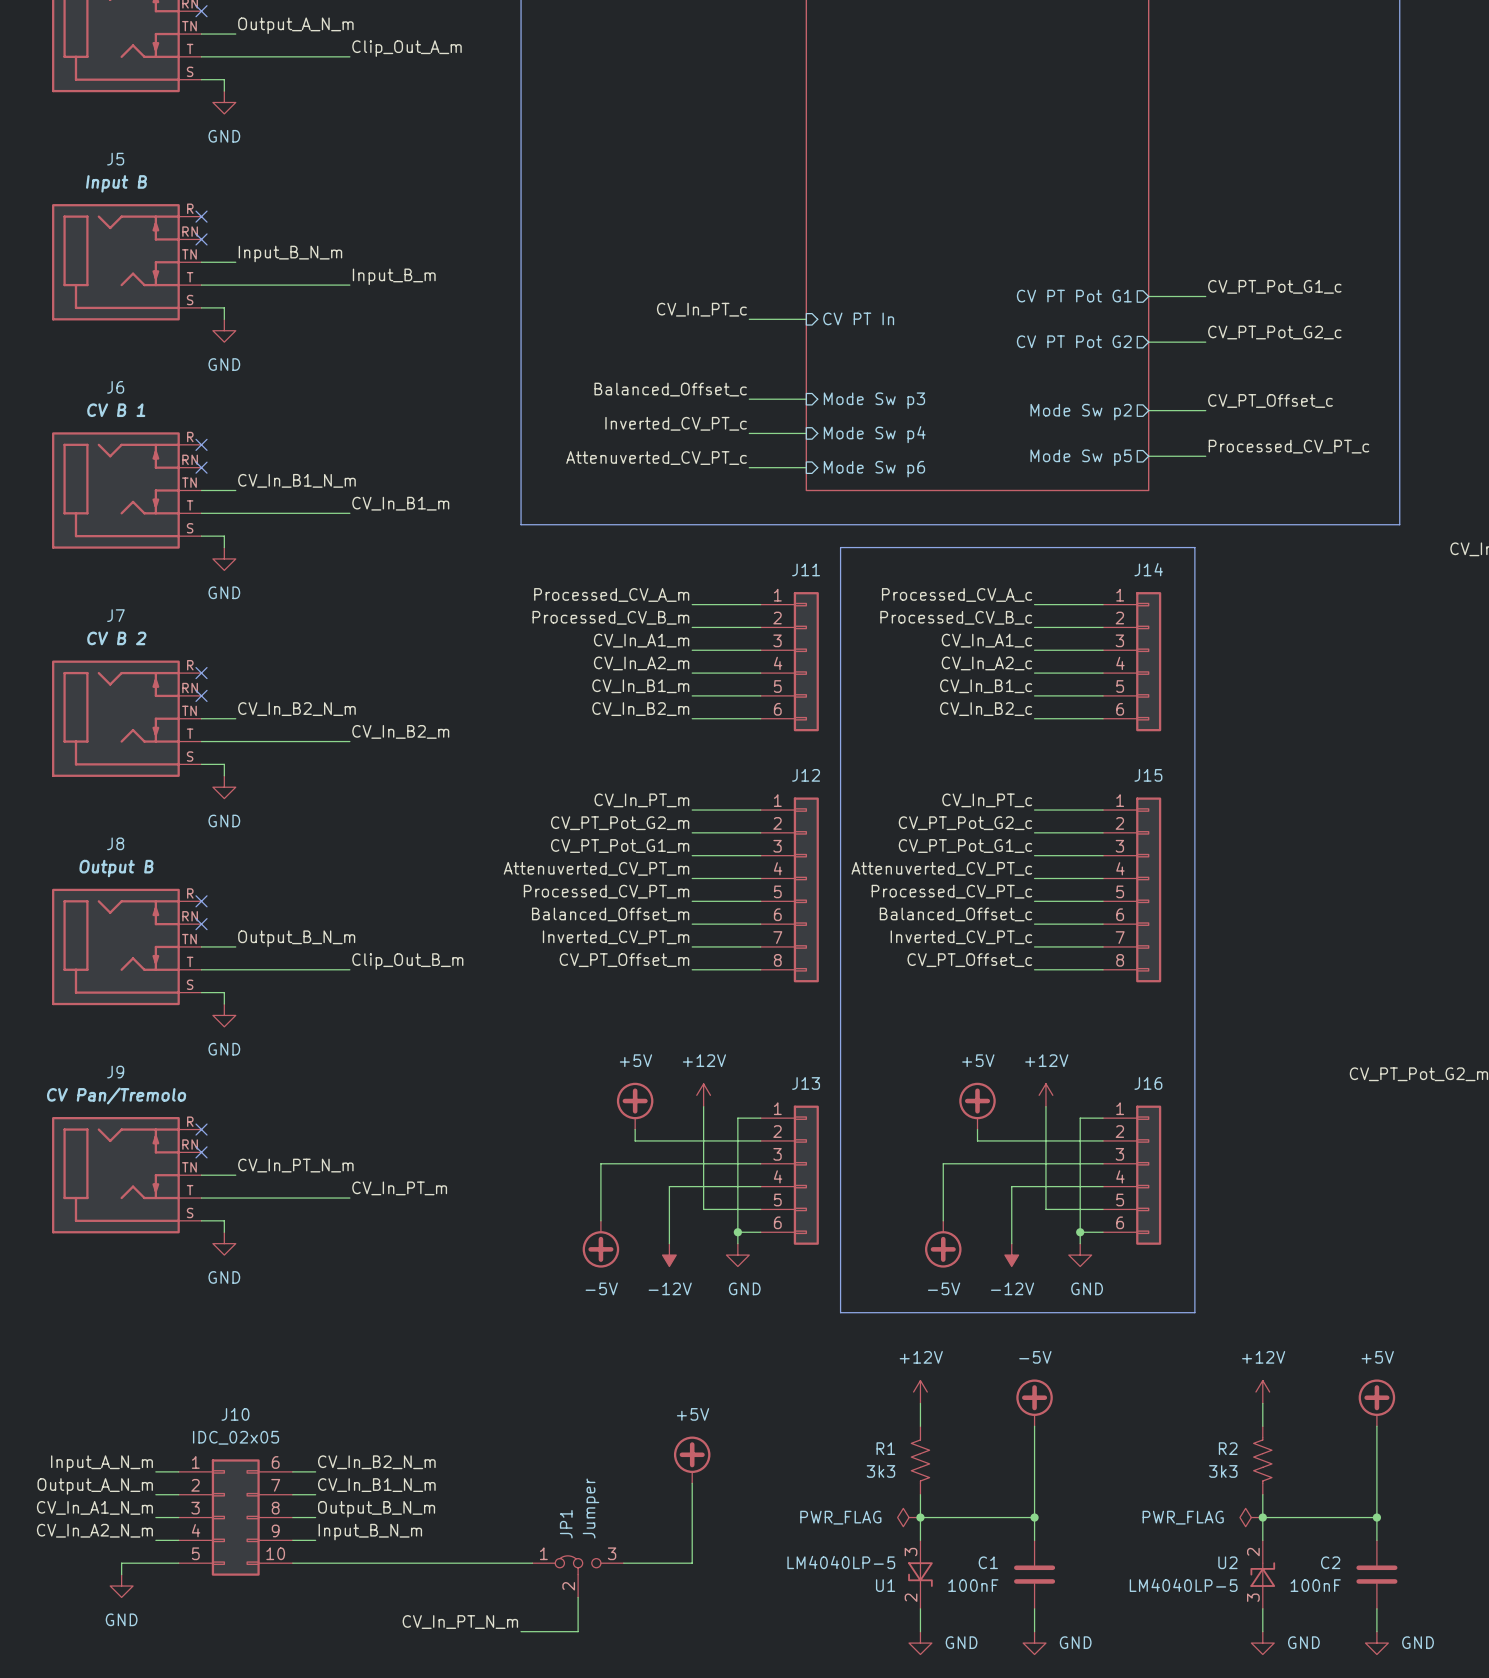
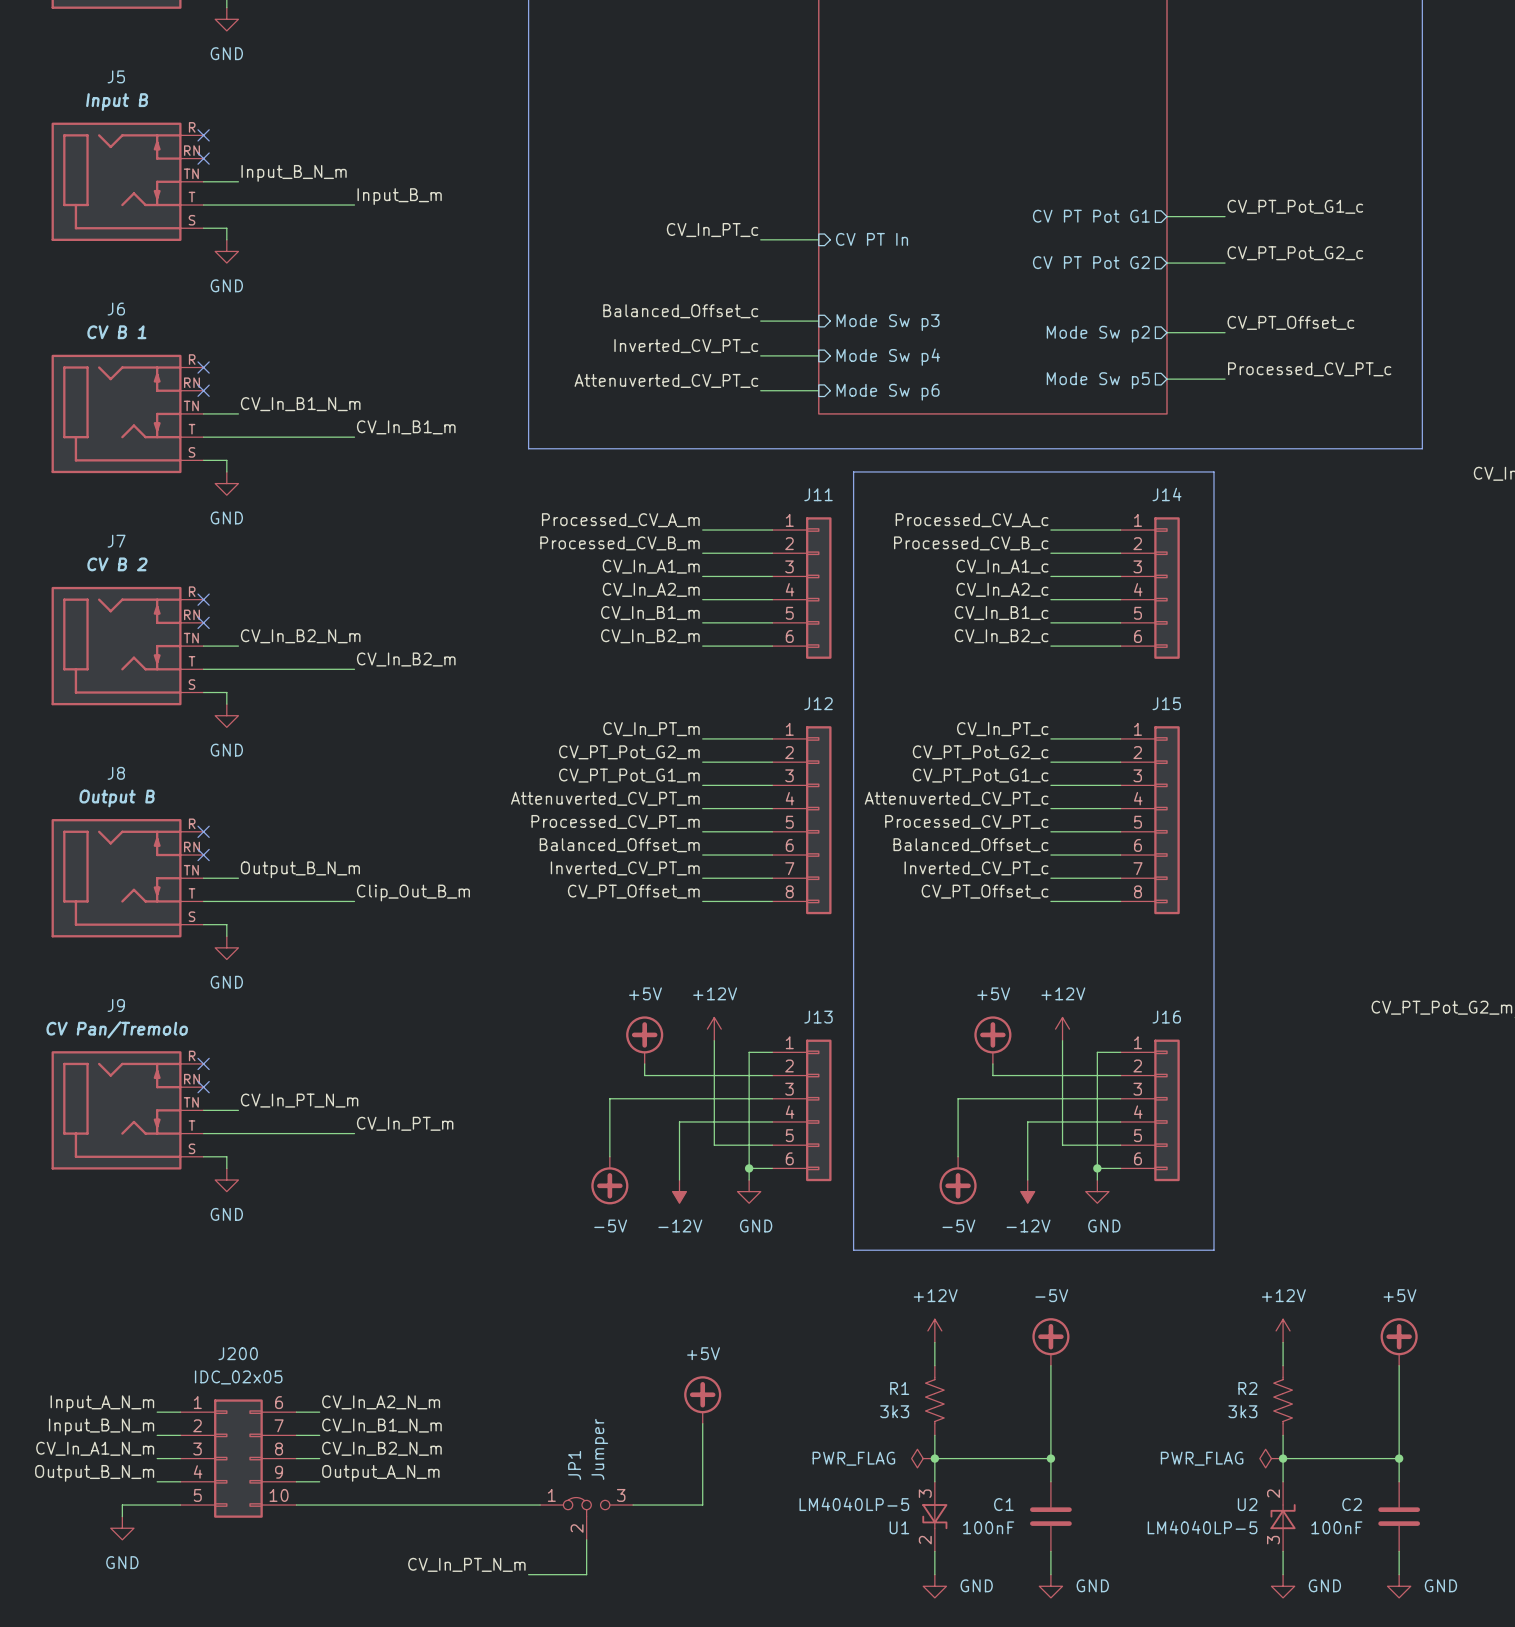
J10 name: J10 (235, 1414) -> J200 (238, 1353)
label: CV_In_B2_N_m (376, 1462) -> CV_In_A2_N_m (381, 1402)
label: Output_A_N_m (95, 1486) -> Input_B_N_m (101, 1426)
label: Output_B_N_m (376, 1509) -> CV_In_B2_N_m (381, 1448)
label: CV_In_A2_N_m (94, 1530) -> Output_B_N_m (94, 1473)
label: Input_B_N_m (370, 1532) -> Output_A_N_m (380, 1473)

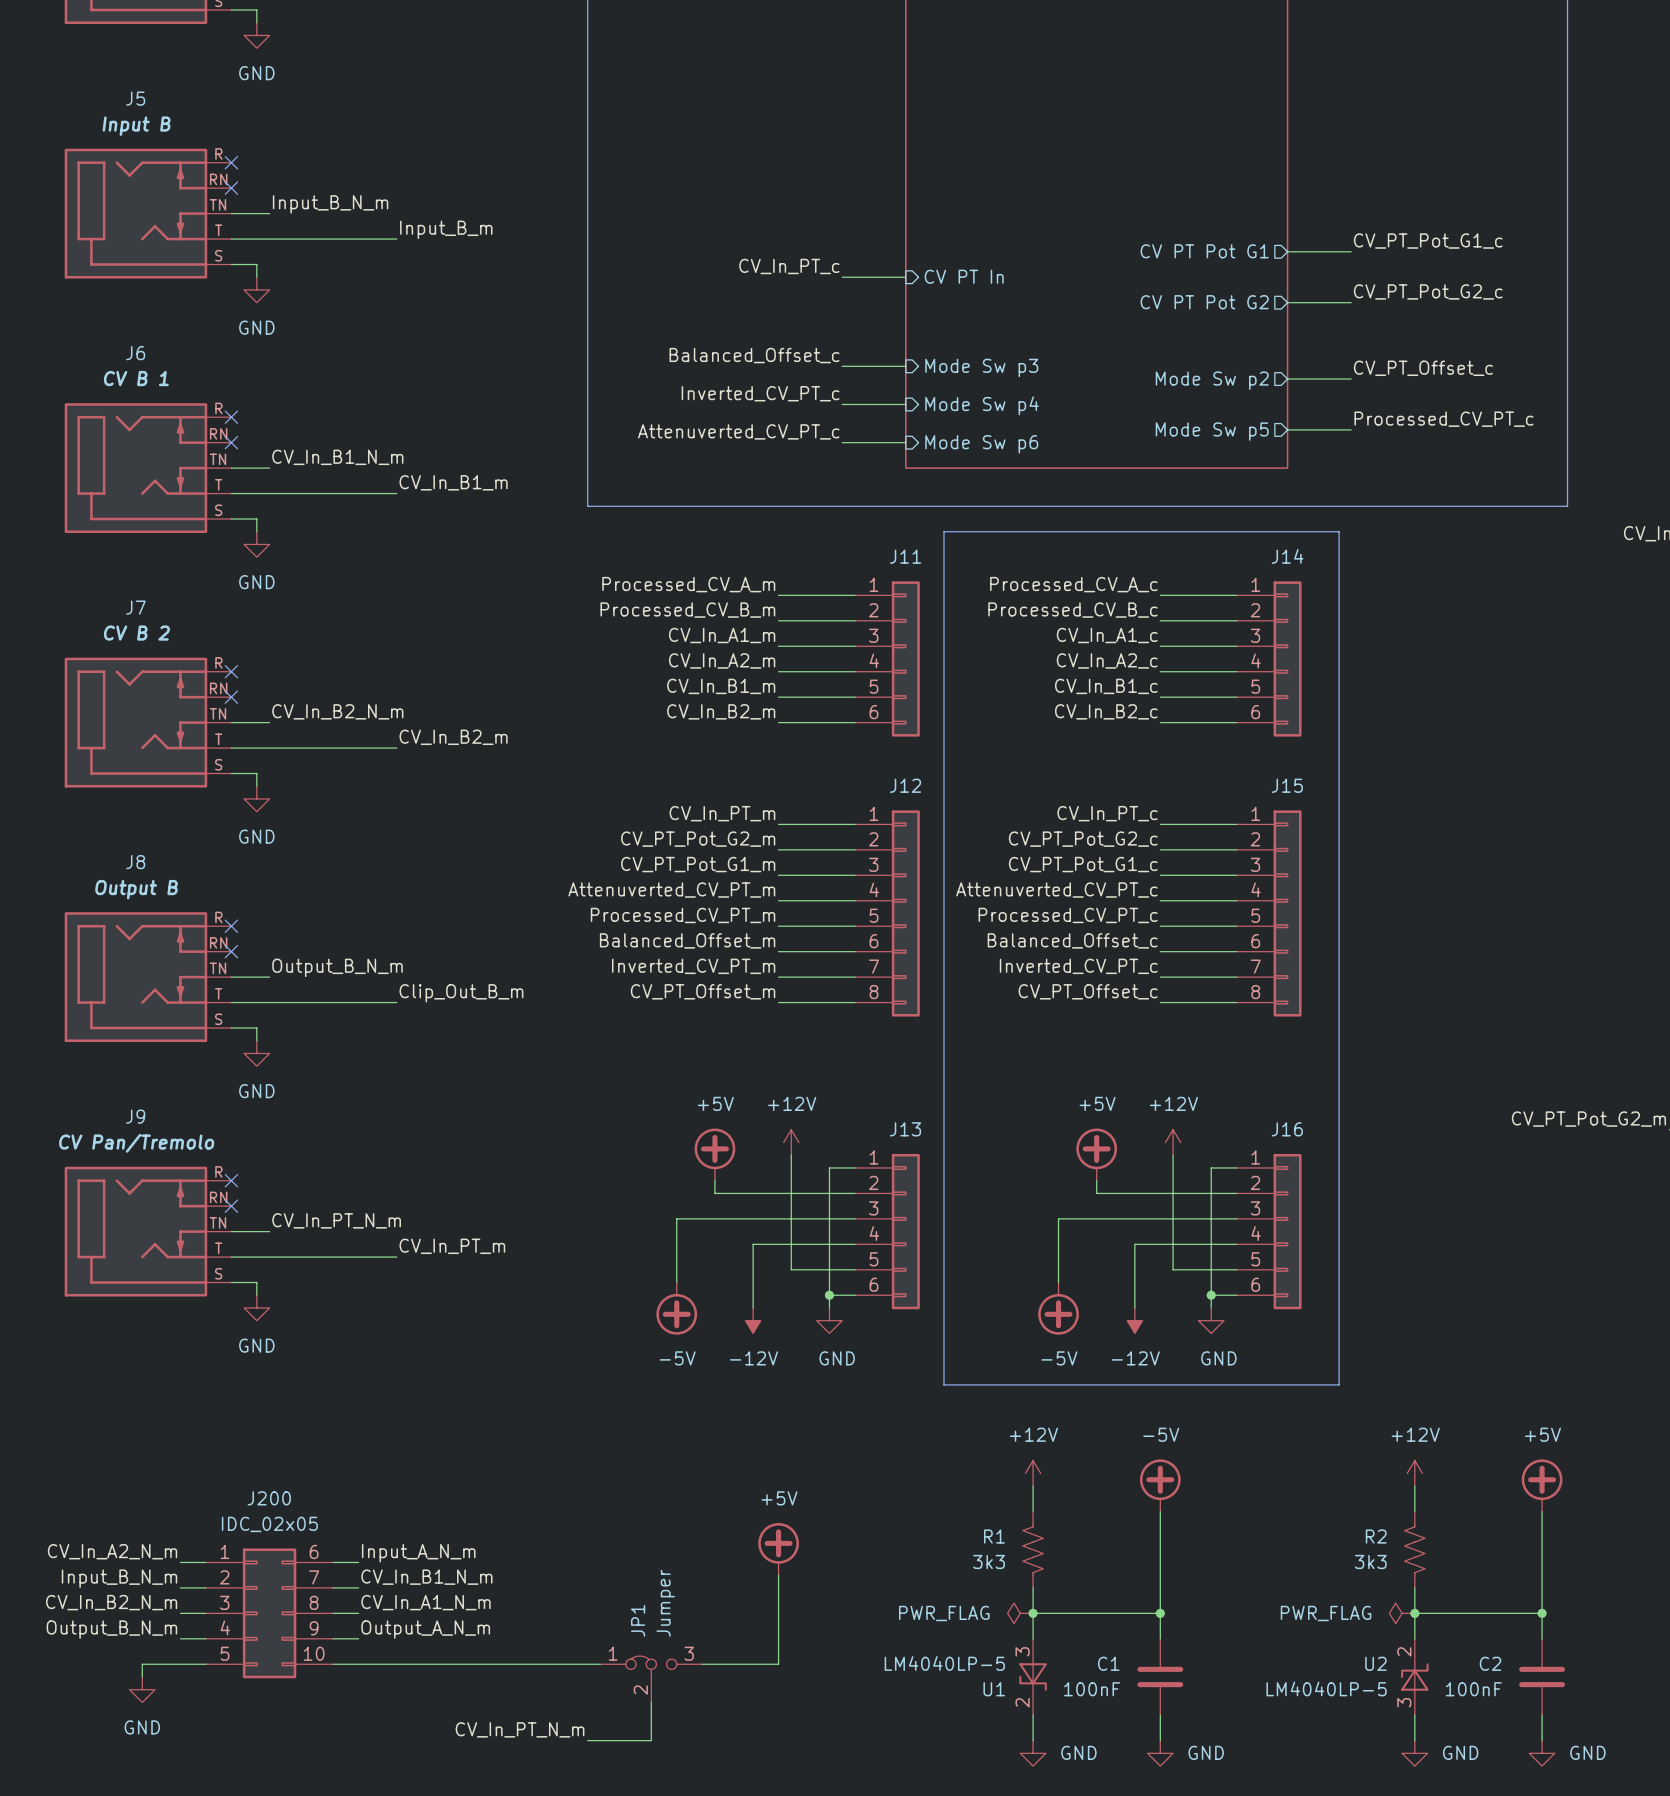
label: CV_In_A2_N_m (381, 1402) -> Input_A_N_m (418, 1553)
label: Input_A_N_m (102, 1403) -> CV_In_A2_N_m (112, 1551)
label: CV_In_A1_N_m (95, 1448) -> CV_In_B2_N_m (111, 1602)
label: CV_In_B2_N_m (381, 1448) -> CV_In_A1_N_m (425, 1602)

